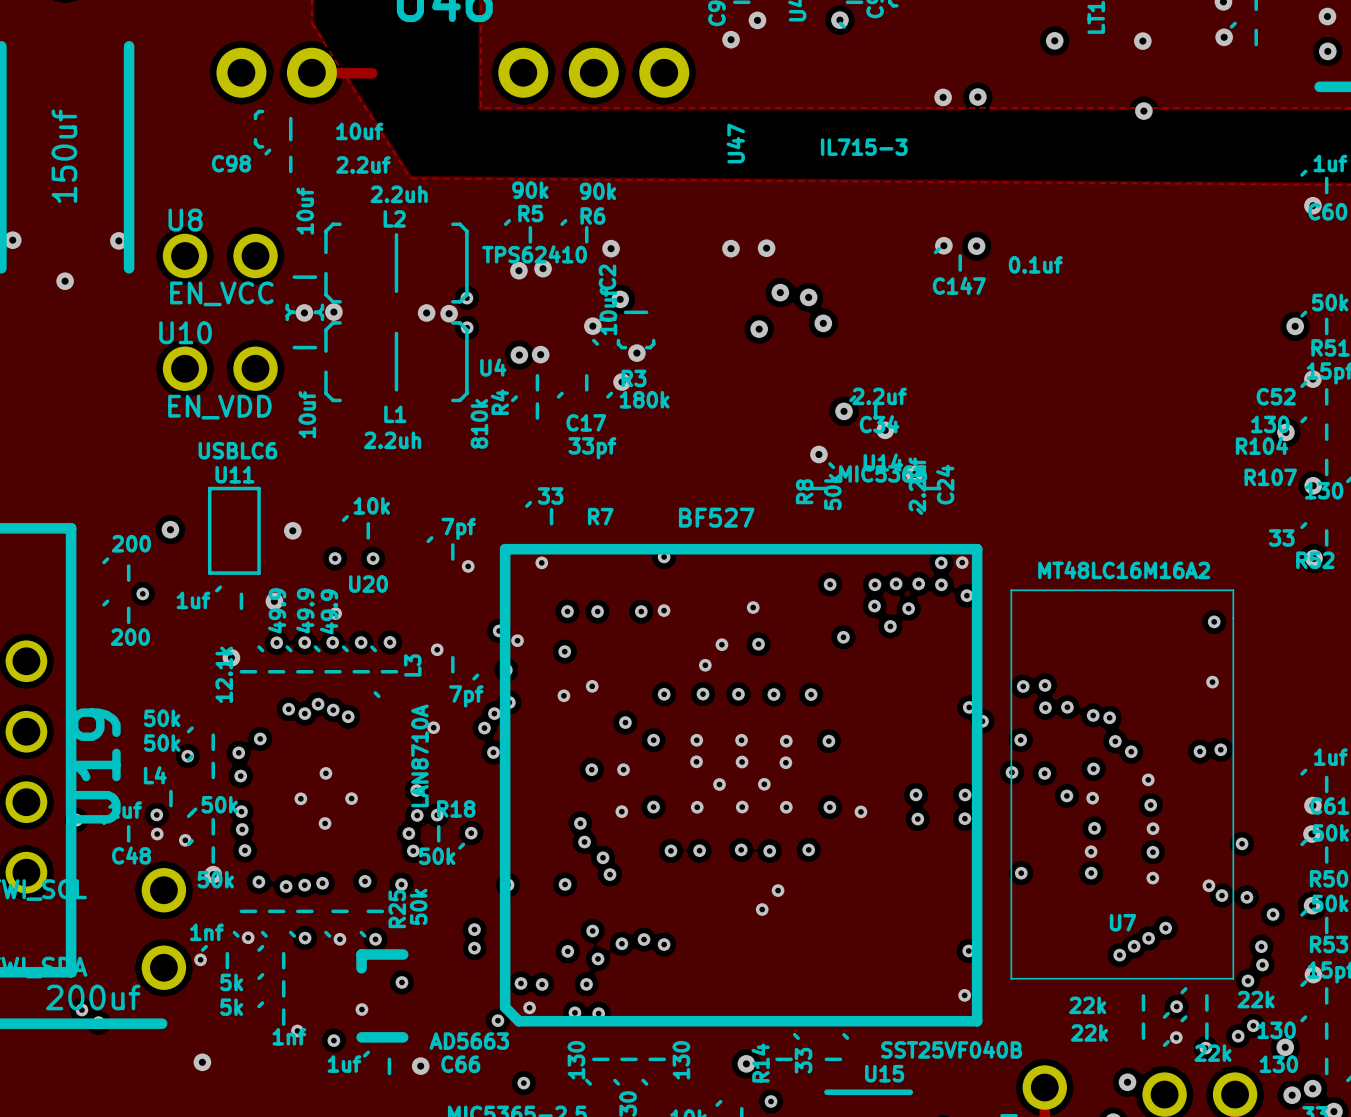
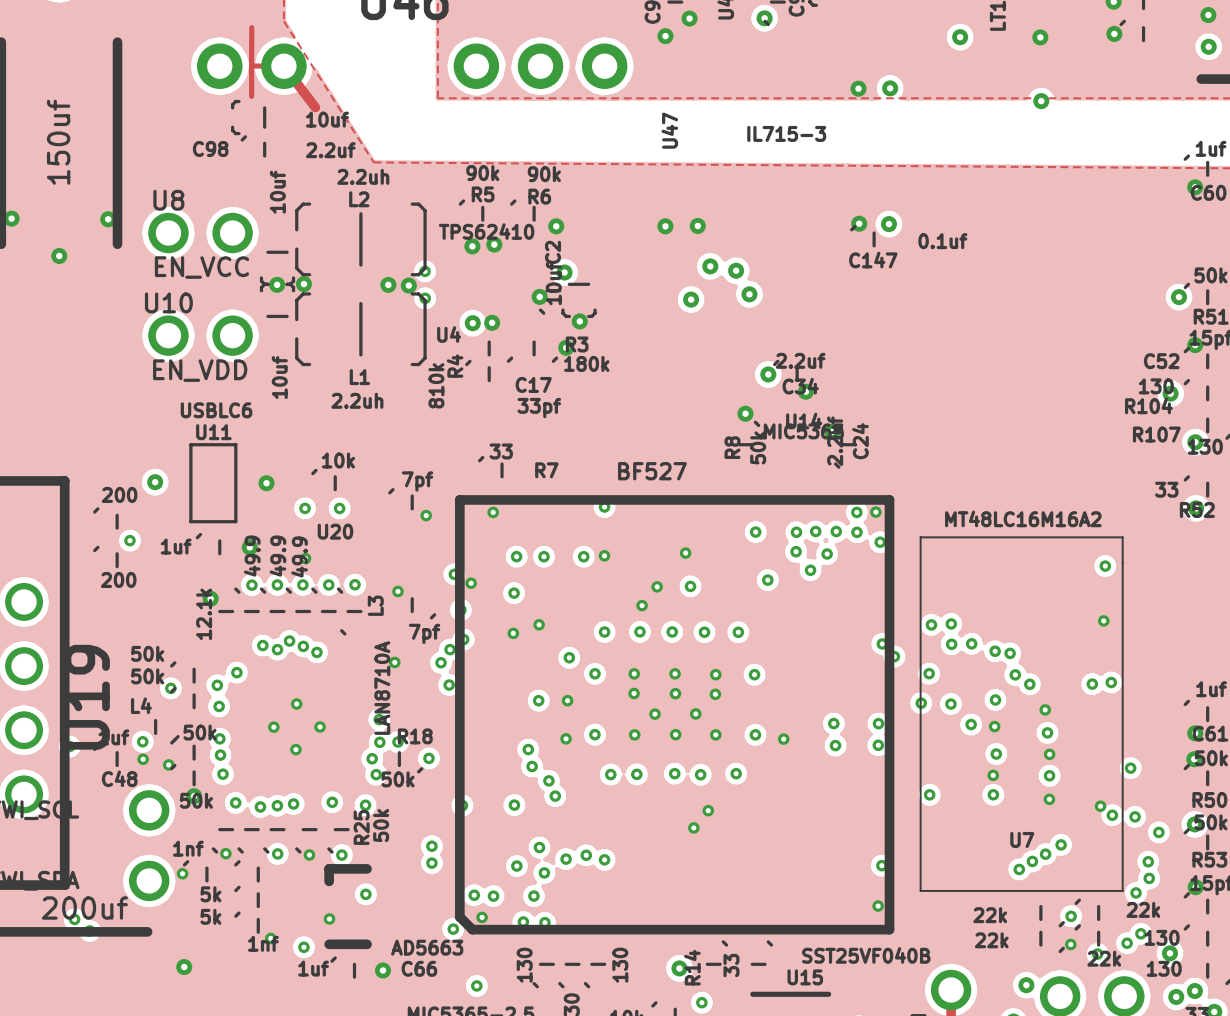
track: none -> (251, 27) (251, 65)
track: none -> (251, 65) (283, 66) (315, 107)
track: none -> (251, 65) (251, 96)
track: (311, 72) (372, 73) -> none

